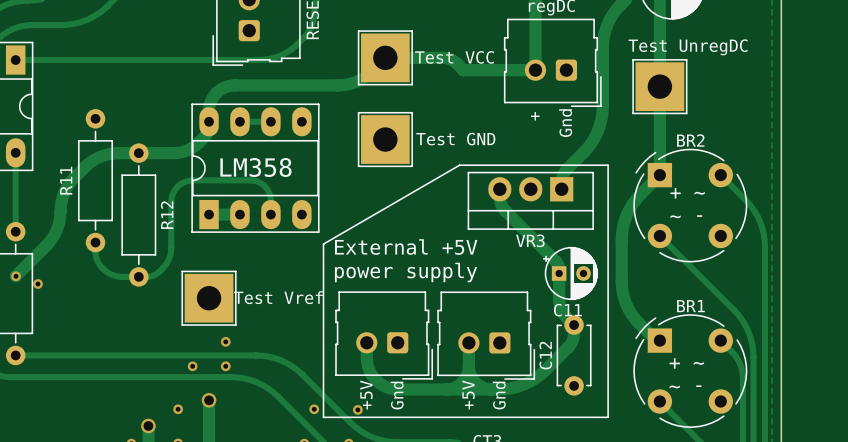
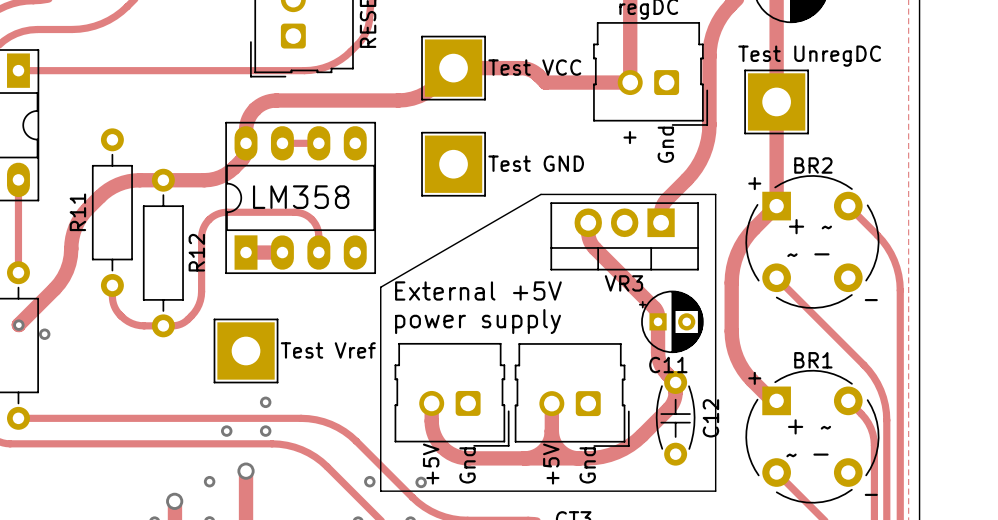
BR2 footprint: [633, 148, 748, 263] -> [745, 175, 880, 309]
BR1 footprint: [633, 314, 748, 428] -> [745, 369, 880, 504]
C12 footprint: [556, 315, 592, 396] -> [655, 371, 696, 466]
C12 name position: C12 (545, 355) -> C12 (710, 418)

